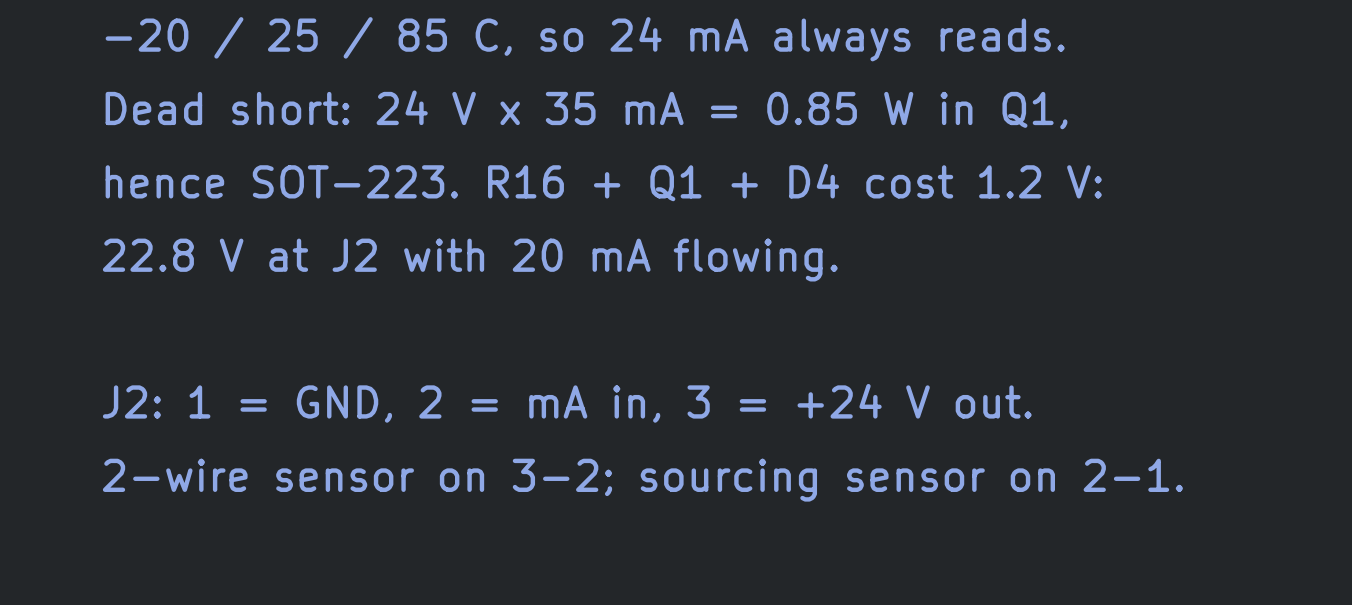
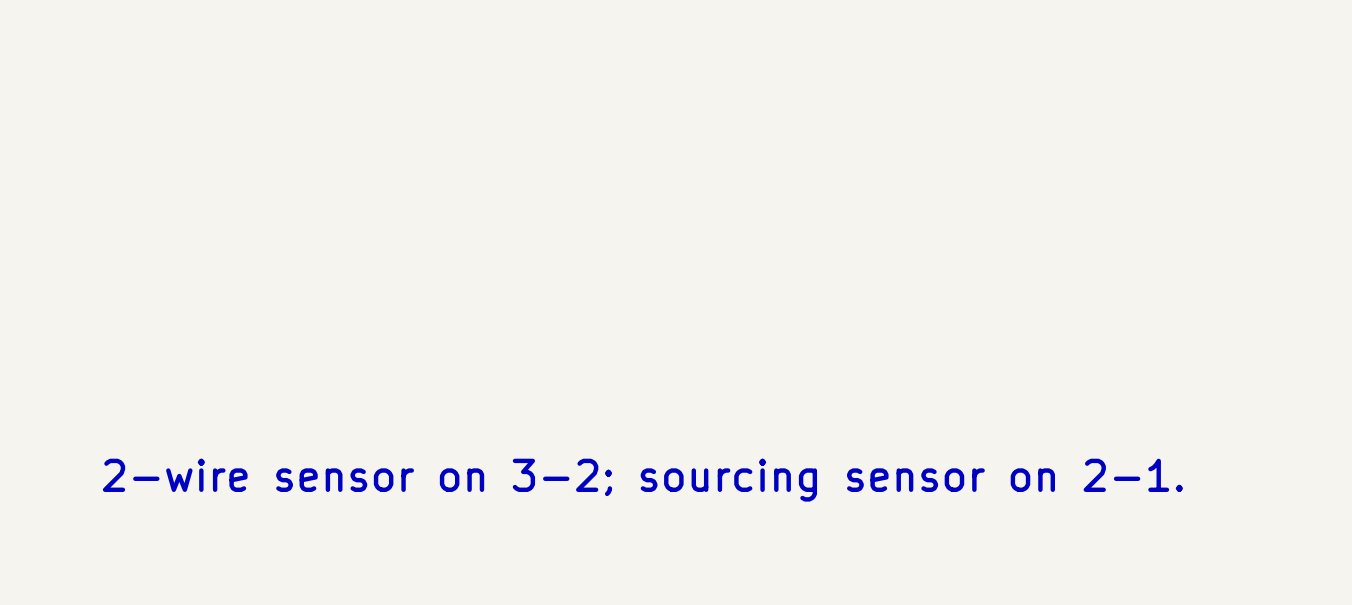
text: -20 / 25 / 85 C, so 24 mA always reads. (585, 39) -> none
text: Dead short: 24 V x 35 mA = 0.85 W in Q1, (586, 109) -> none
text: hence SOT-223. R16 + Q1 + D4 cost 1.2 V: (603, 182) -> none
text: 22.8 V at J2 with 20 mA flowing. (470, 260) -> none
text: J2: 1 = GND, 2 = mA in, 3 = +24 V out. (567, 403) -> none

